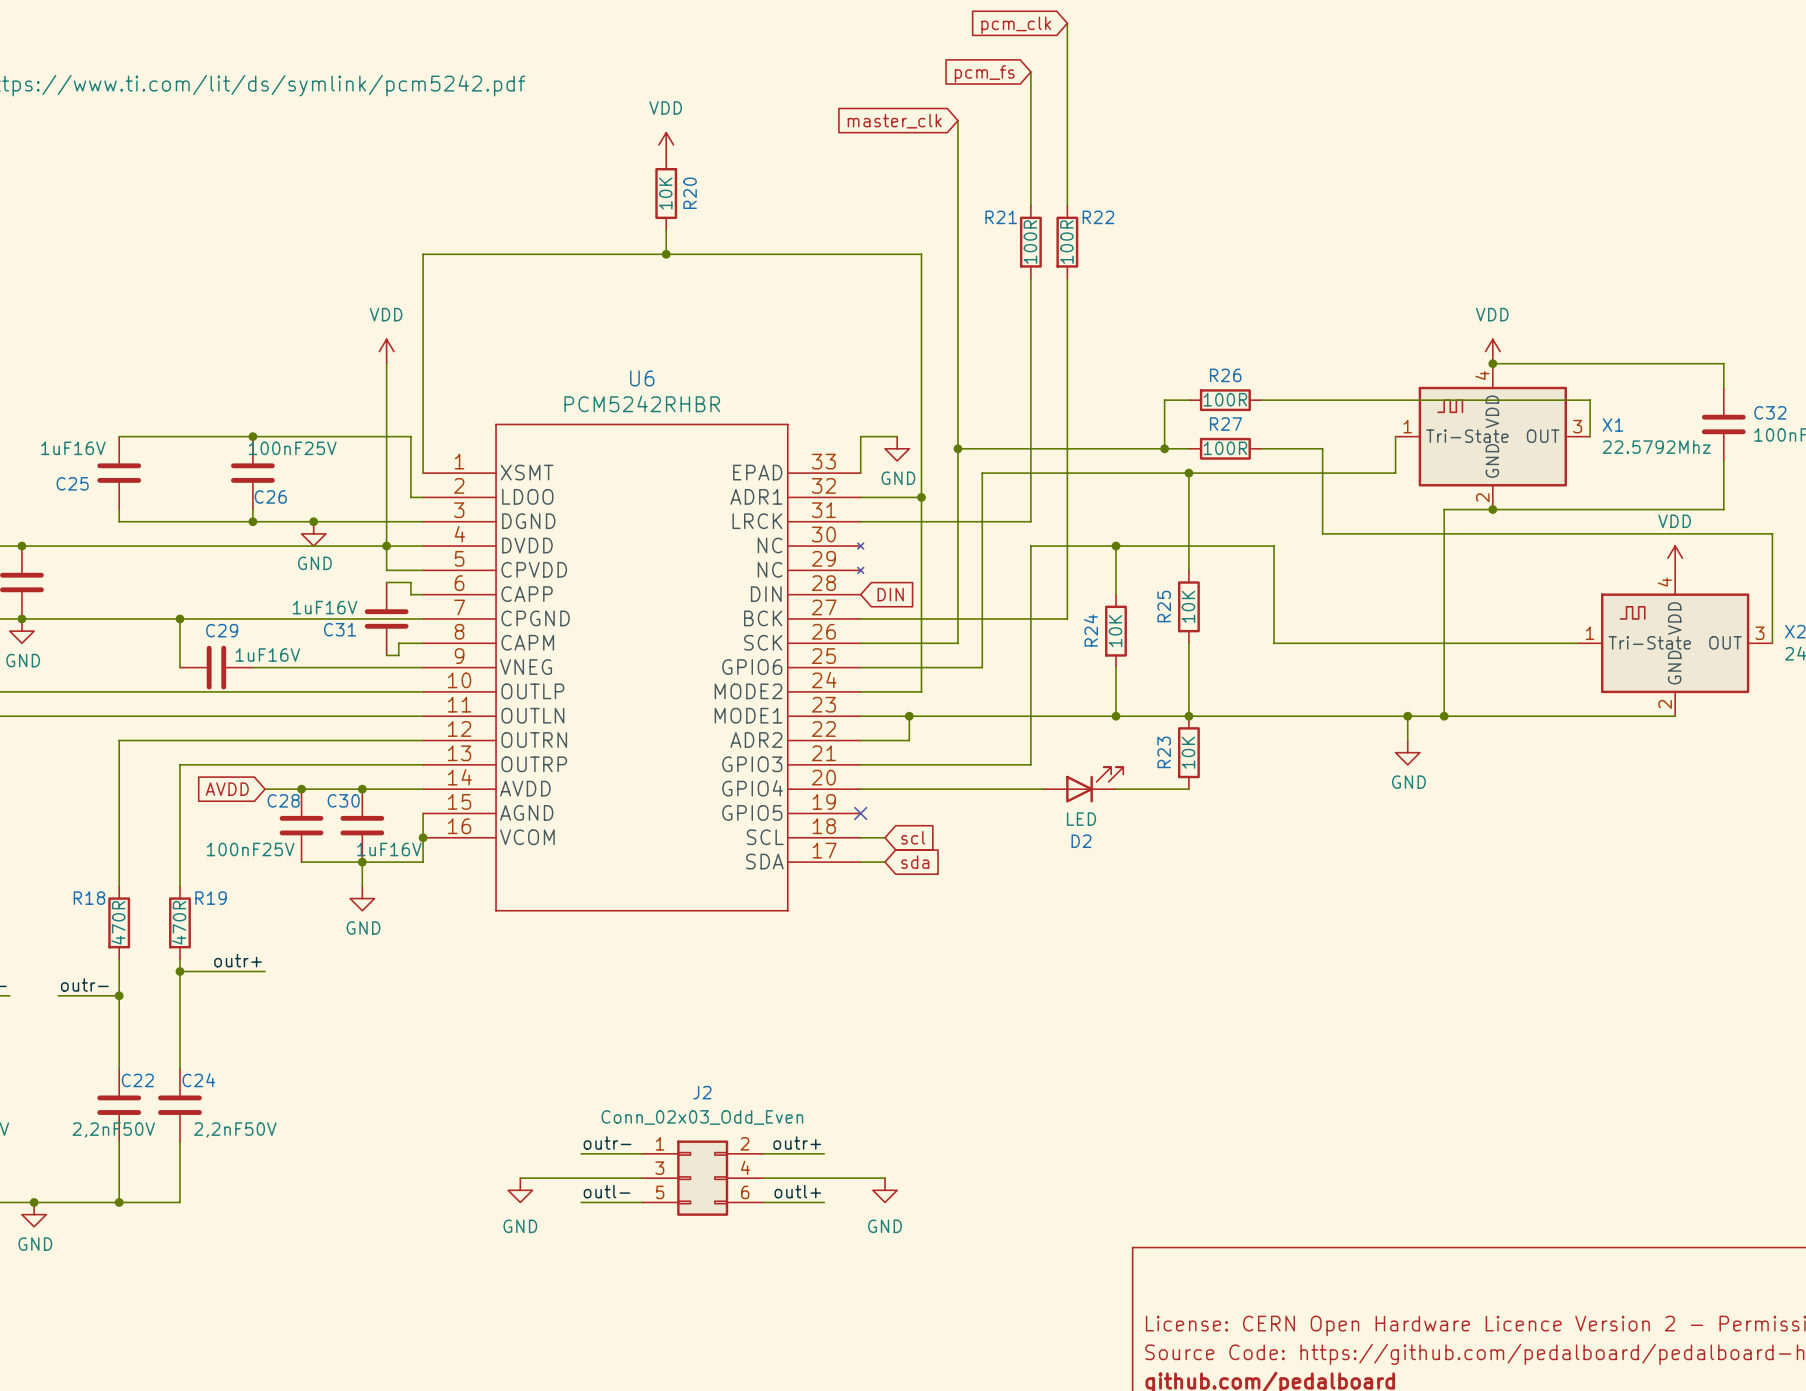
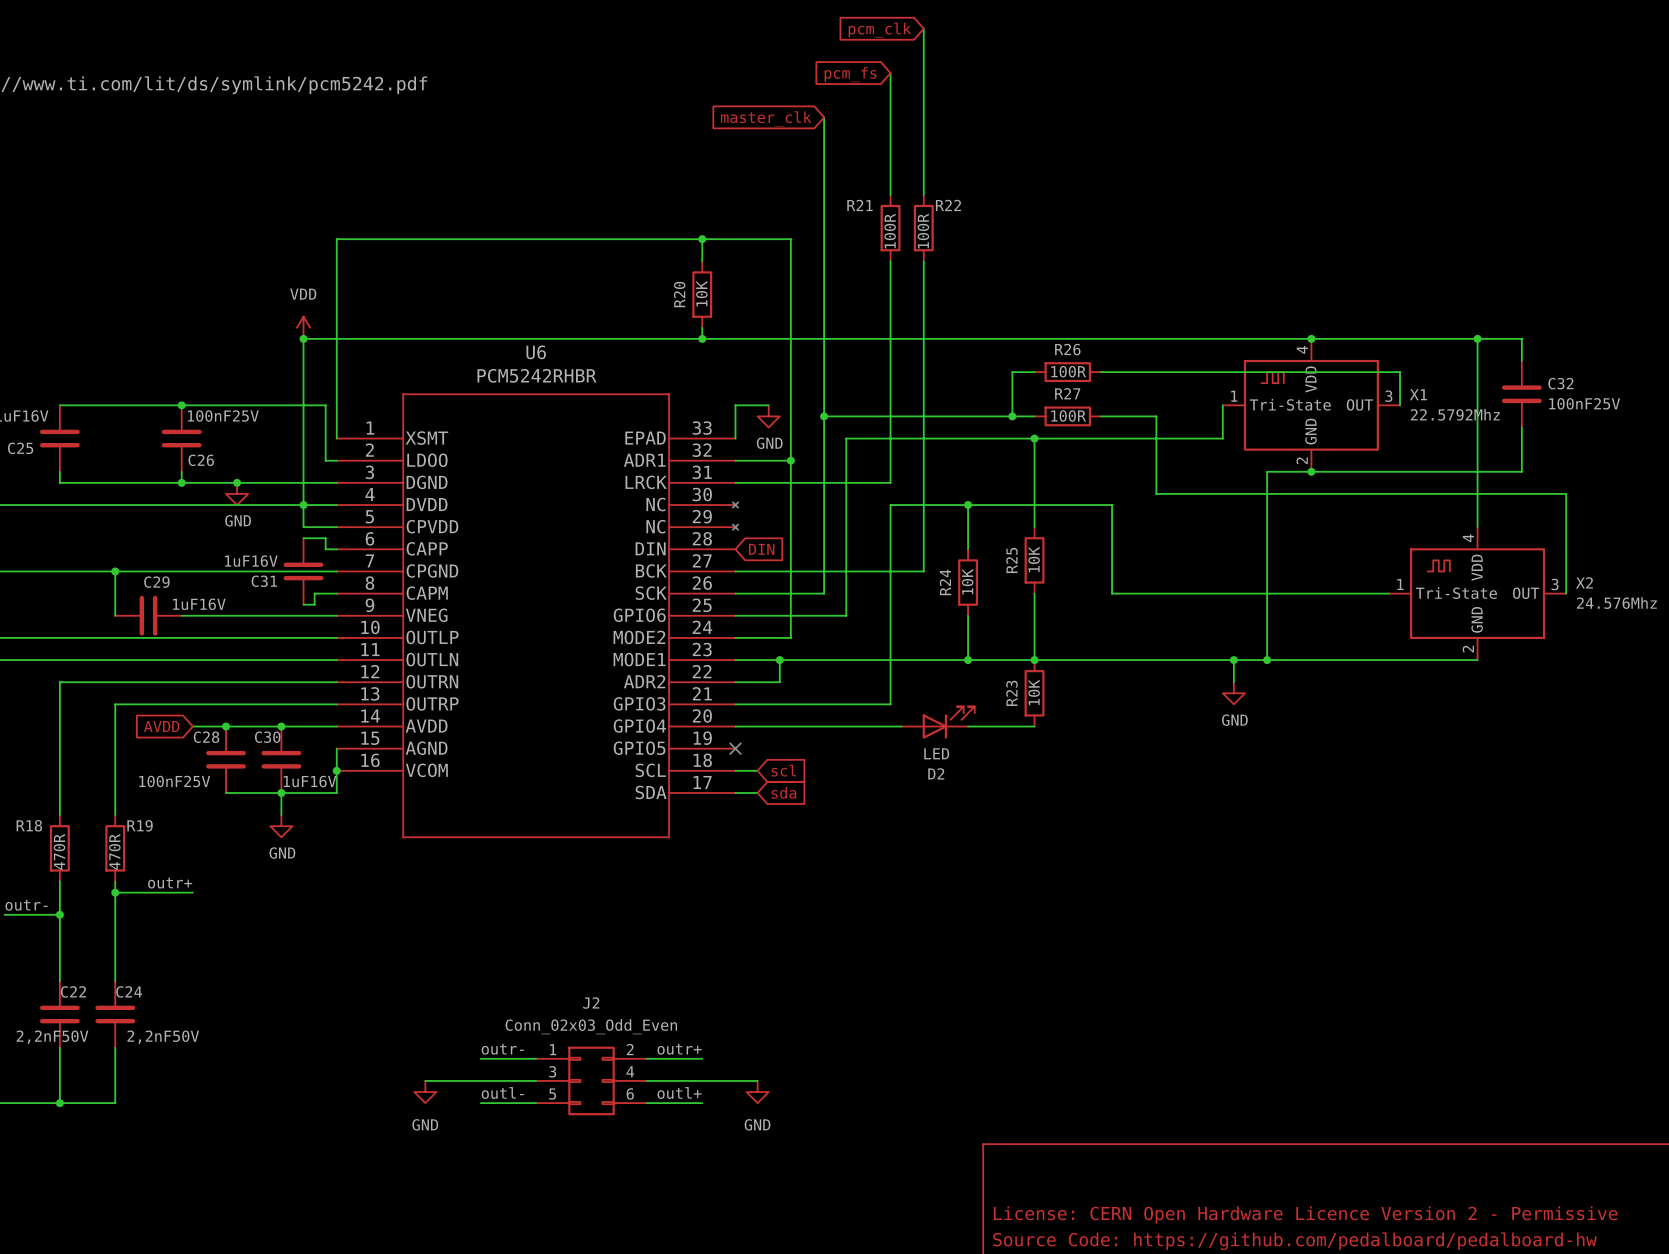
power symbol: VDD (666, 144) -> none
R20 position: (666, 193) -> (702, 294)
R20 name position: R20 (690, 193) -> R20 (679, 294)
wire: (666, 229) (666, 254) -> (702, 239) (702, 261)
junction: (666, 254) -> none
junction: none -> (702, 239)
wire: none -> (702, 327) (702, 338)
power symbol: VDD (1492, 351) -> none
wire: none -> (303, 338) (1311, 338)
junction: none -> (303, 338)
junction: none -> (702, 338)
wire: none -> (1477, 338) (1477, 527)
junction: none -> (1477, 338)
power symbol: VDD (1675, 558) -> none

